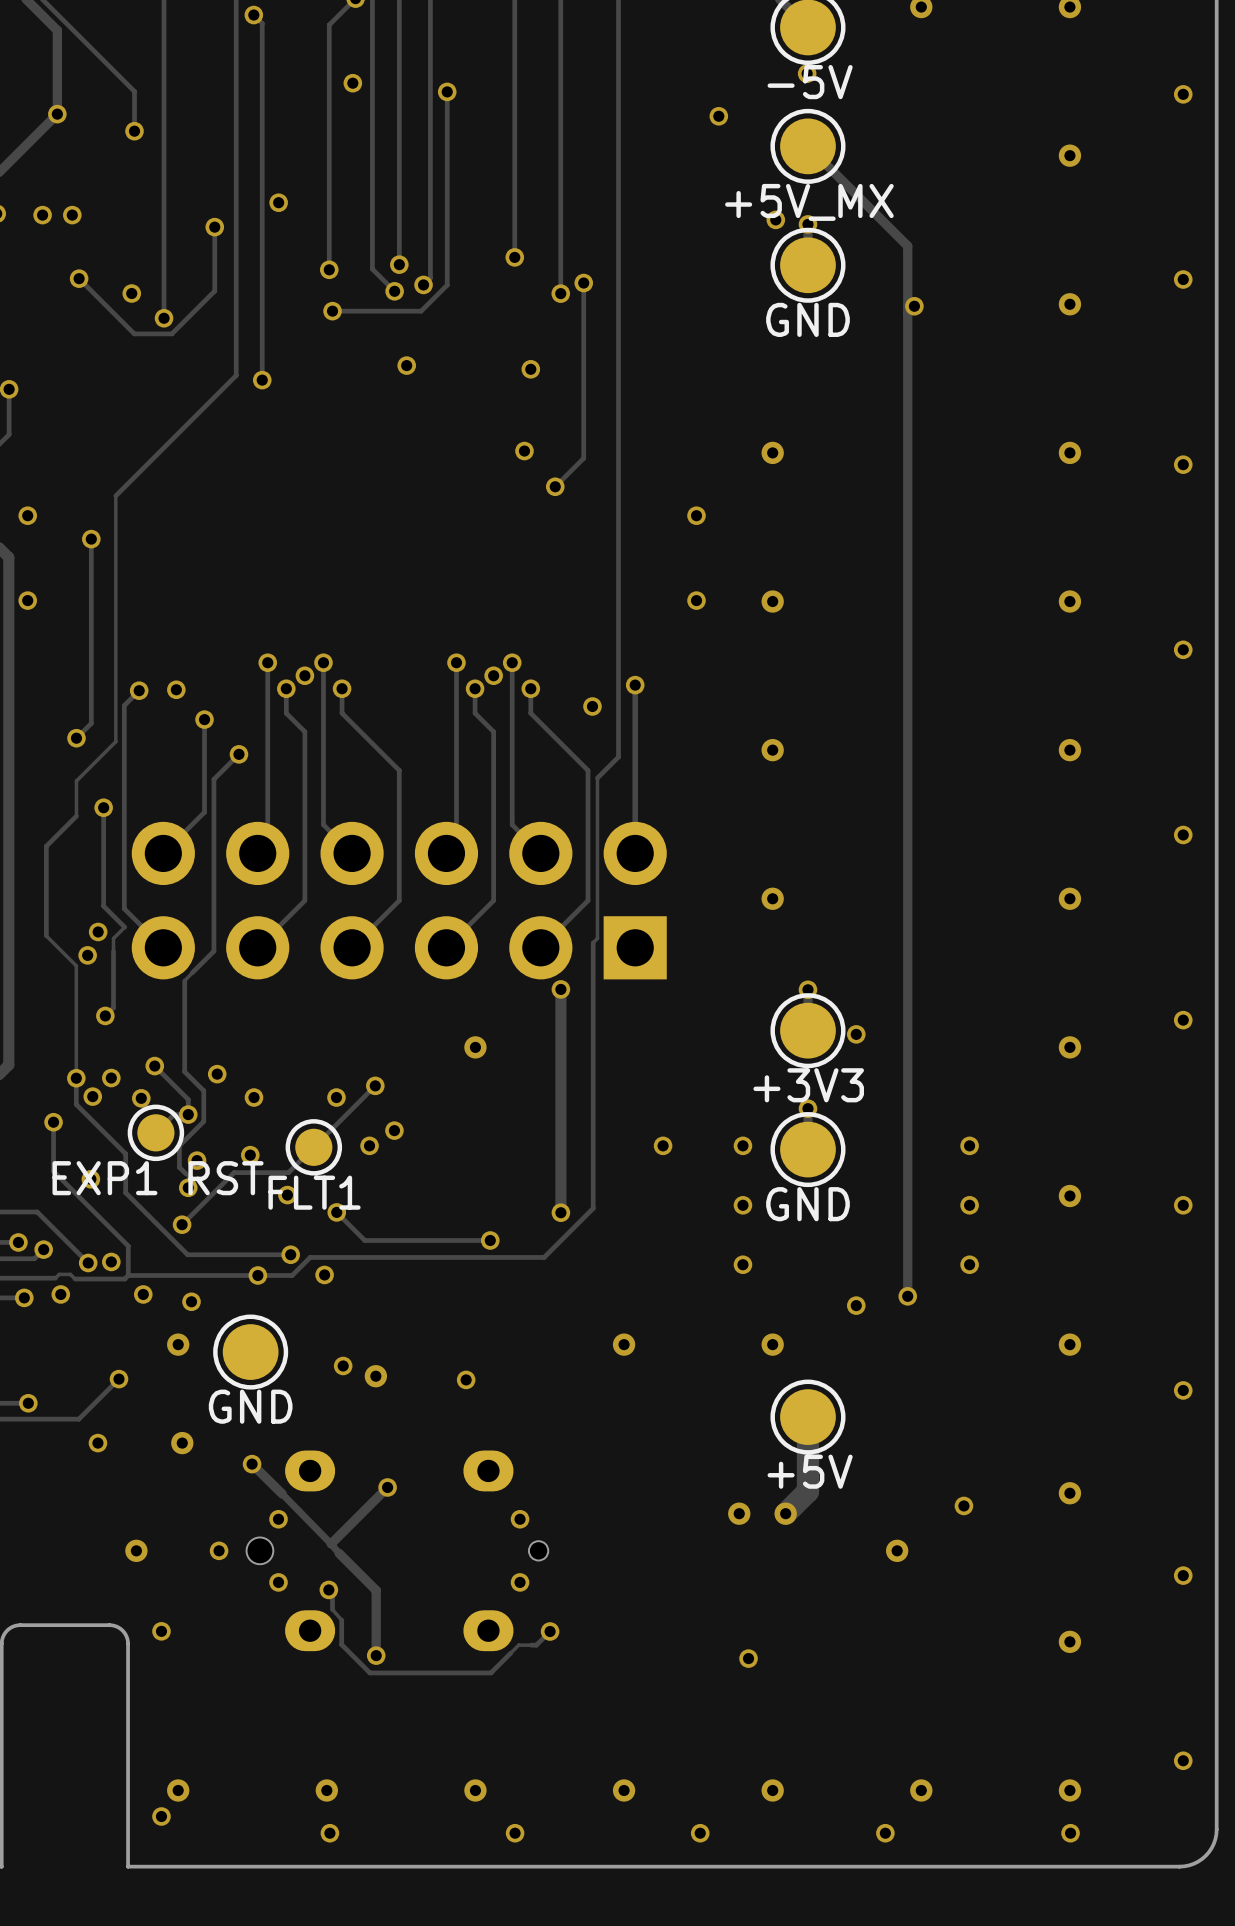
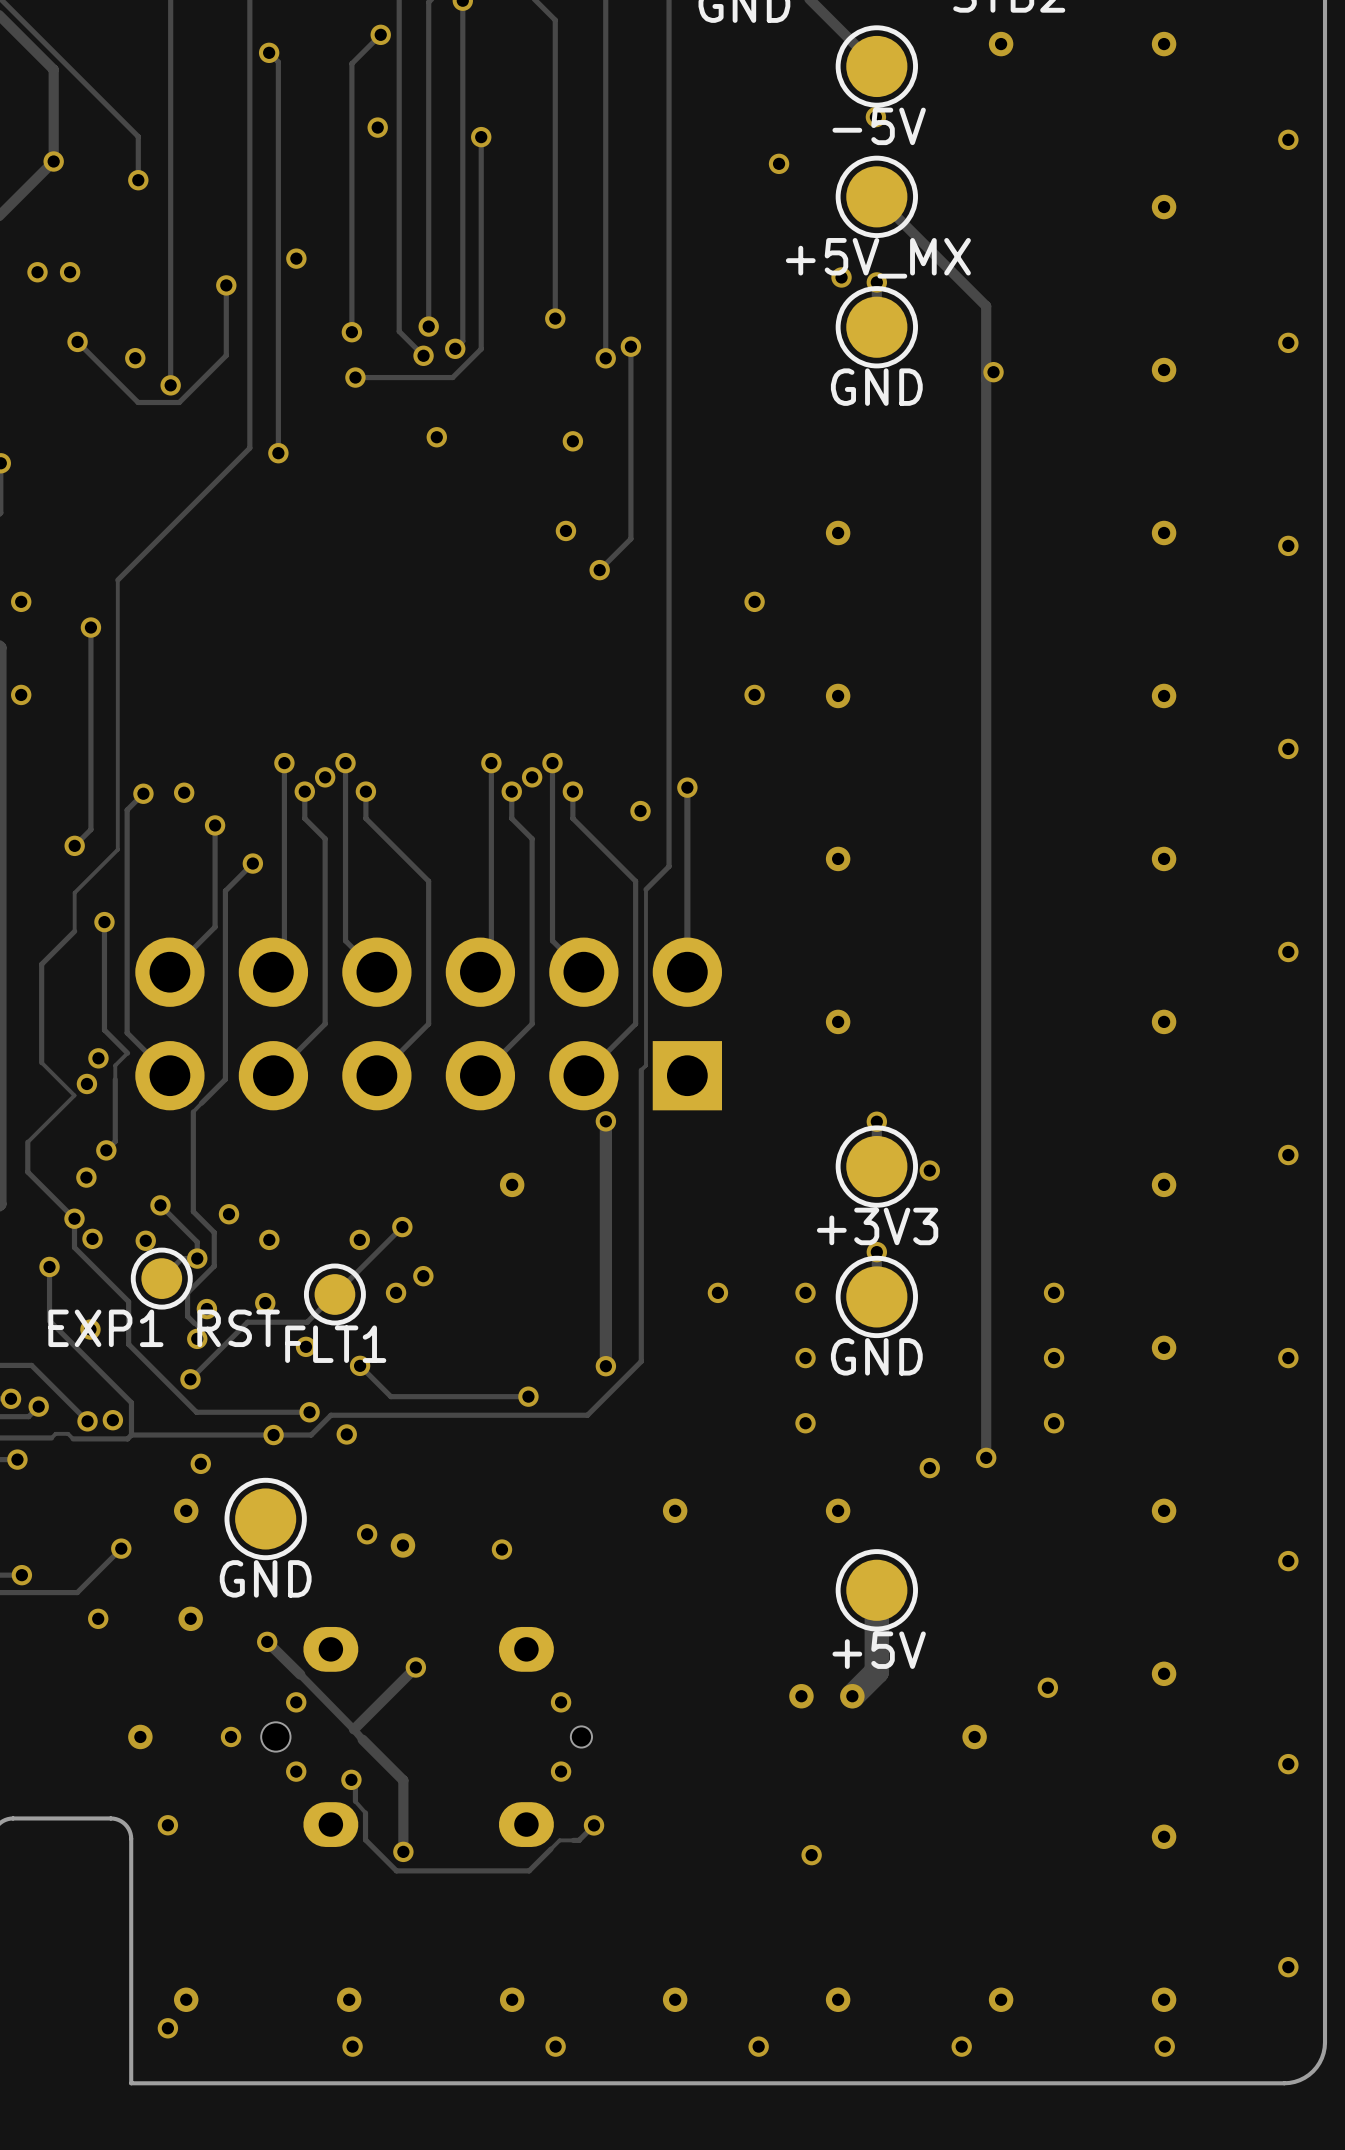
track: (76, 965) (76, 1078) -> (74, 1095) (27, 1142) (27, 1172) (74, 1218)
via position: (111, 1078) -> (86, 1177)
via: (60, 1294) -> none
via: (143, 1294) -> none

